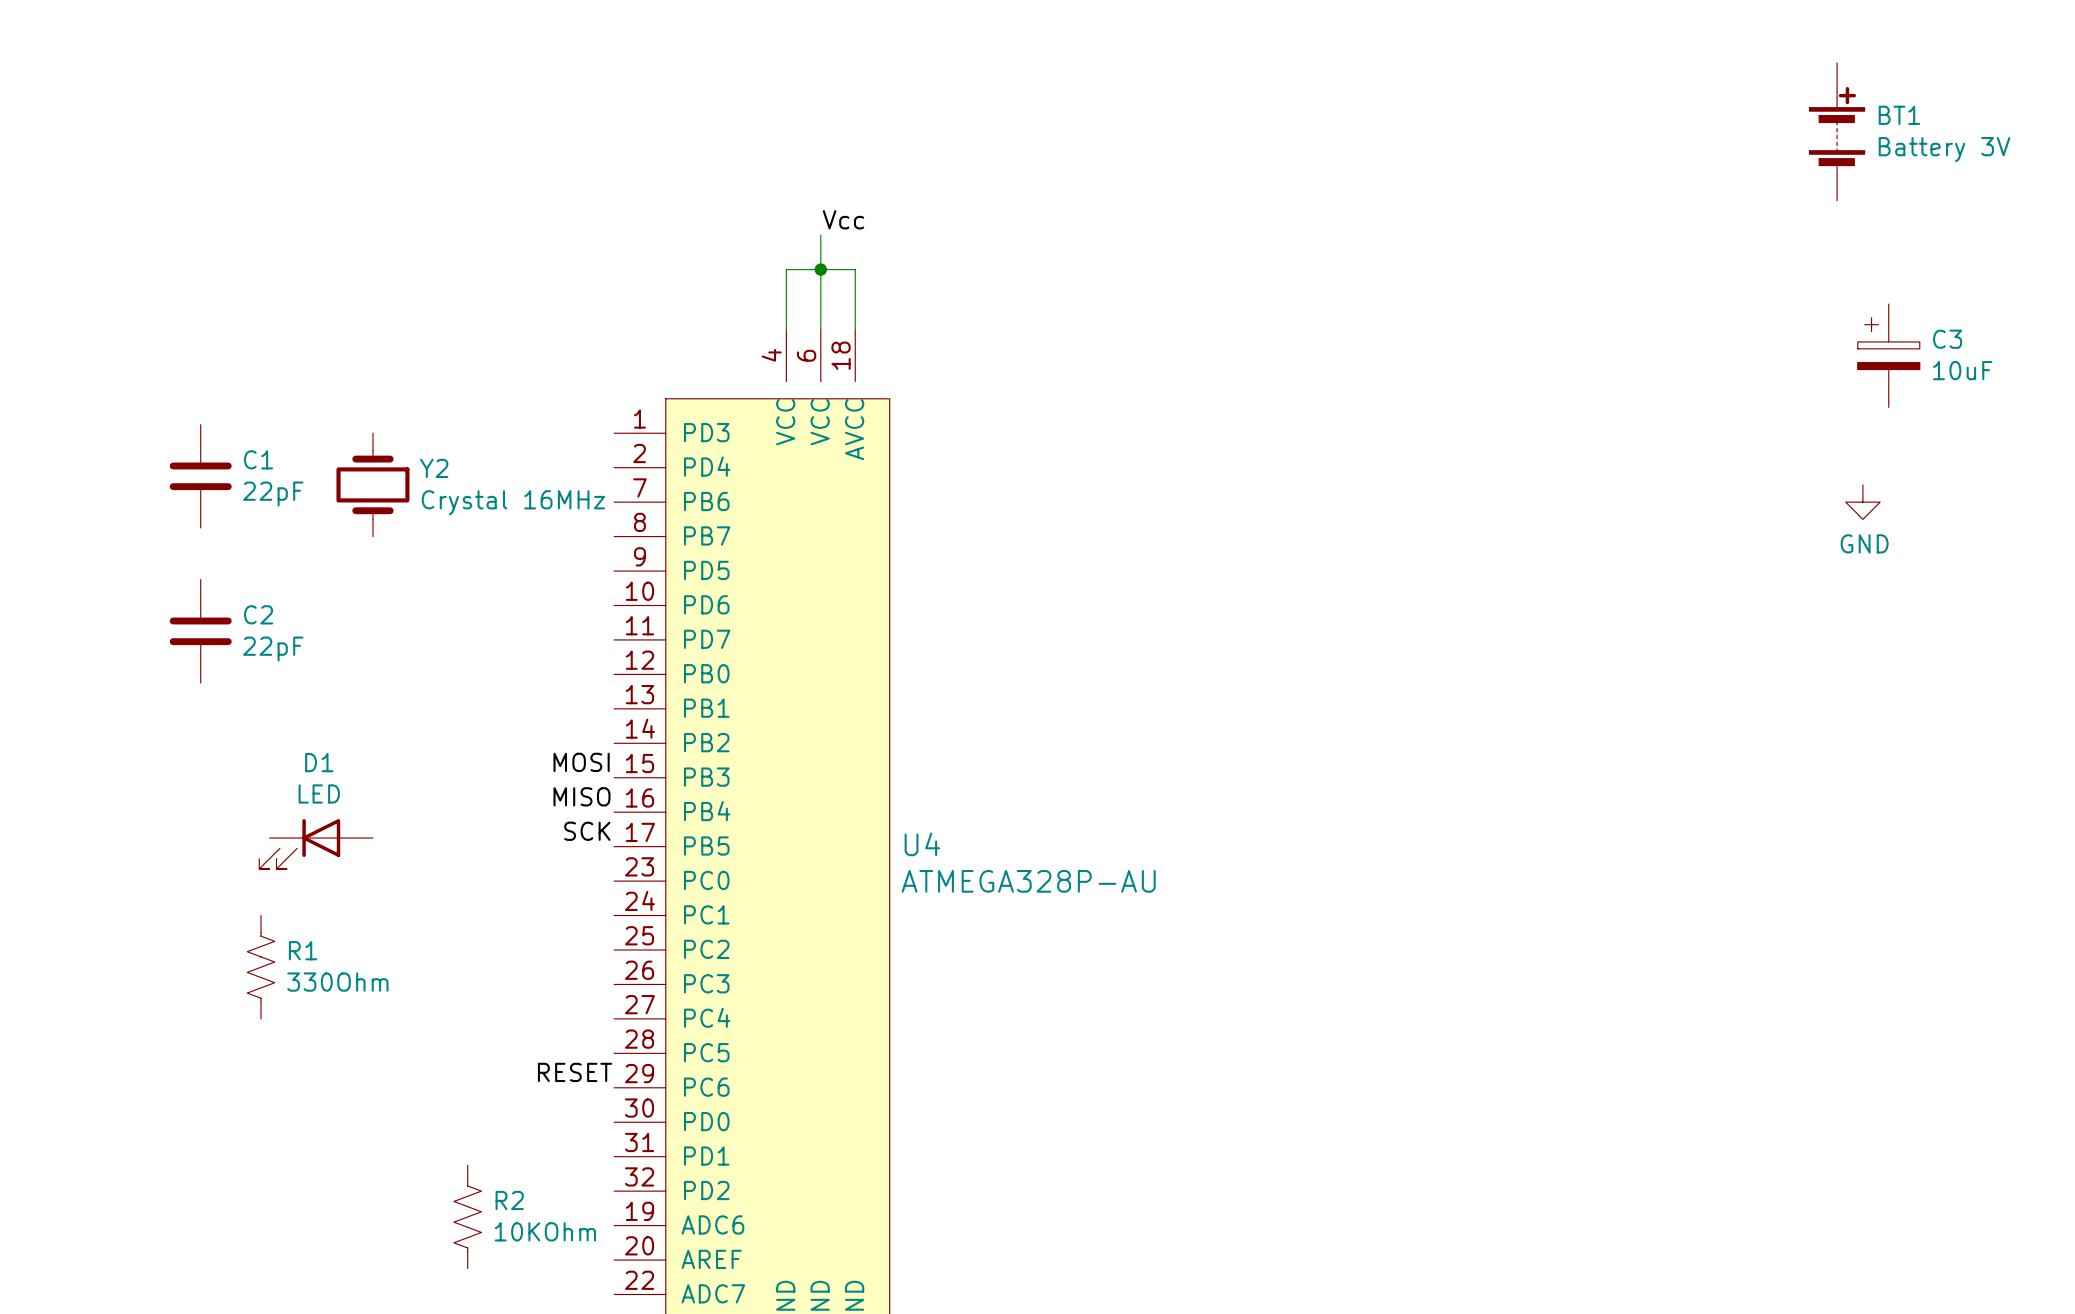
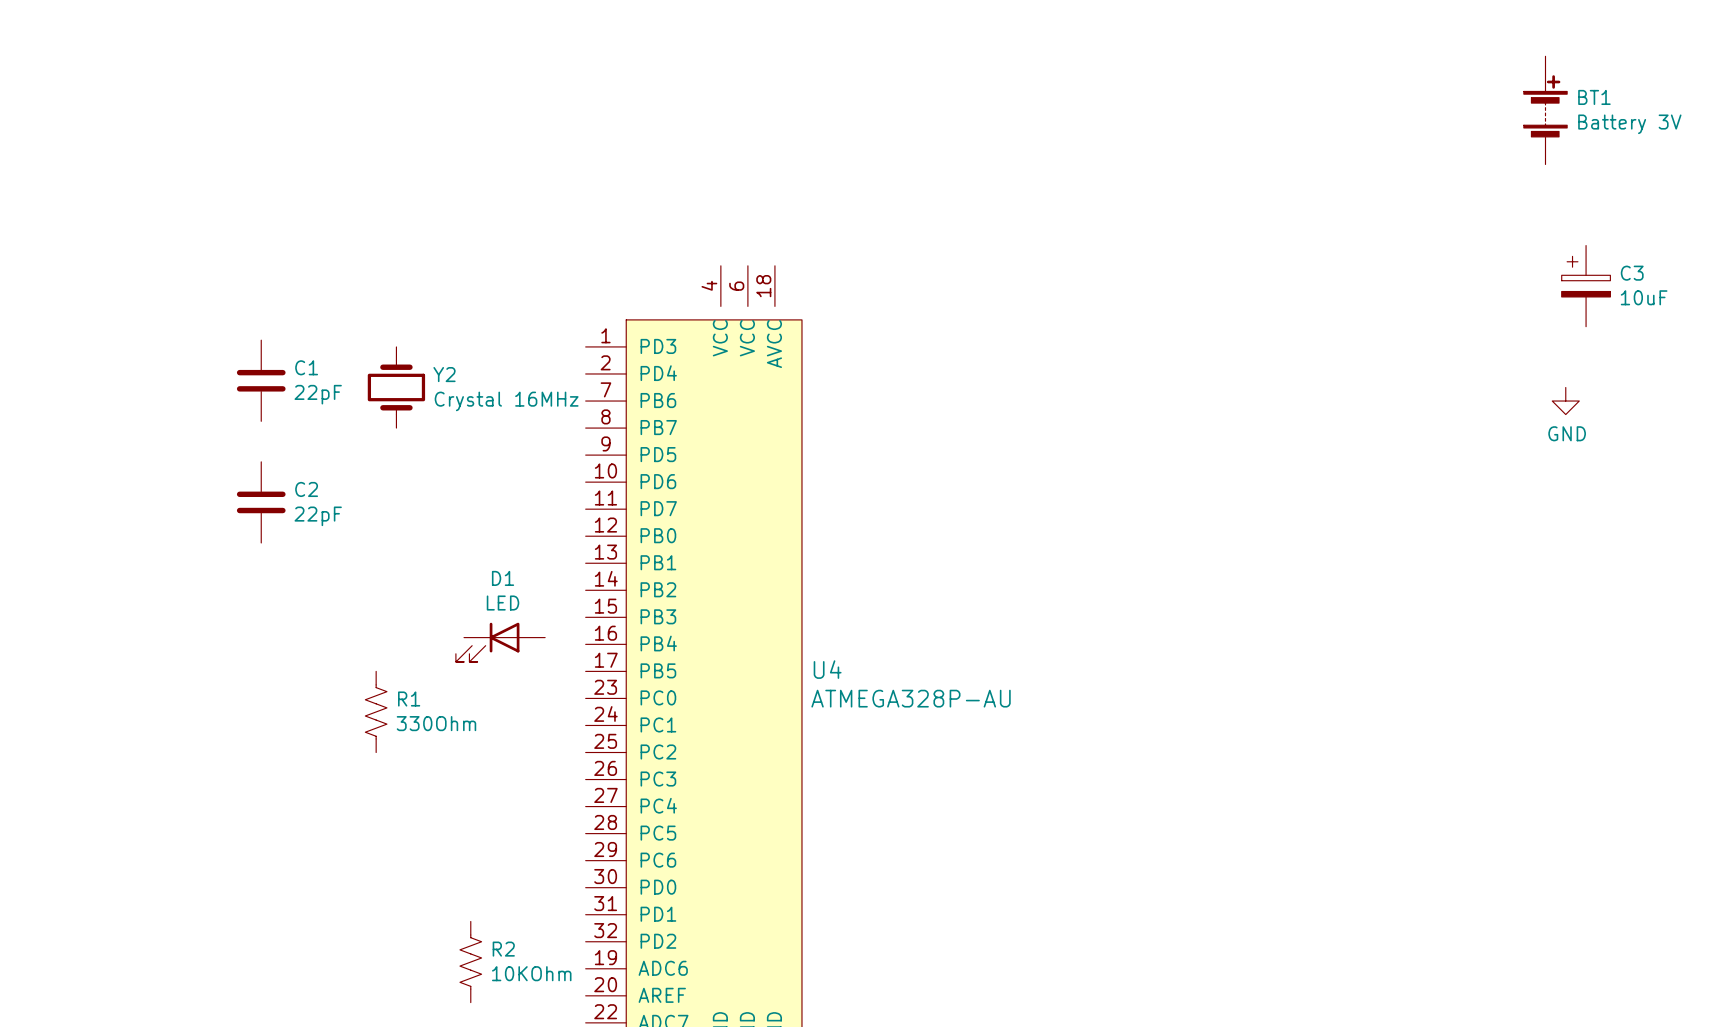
label: Vcc (843, 219) -> none
wire: (820, 235) (820, 329) -> none
junction: (820, 269) -> none
wire: (786, 329) (786, 269) (855, 269) (855, 329) -> none
label: MOSI (581, 762) -> none
label: MISO (581, 796) -> none
label: SCK (587, 831) -> none
D1 position: (316, 844) -> (500, 642)
R1 position: (261, 967) -> (376, 711)
label: RESET (575, 1072) -> none

